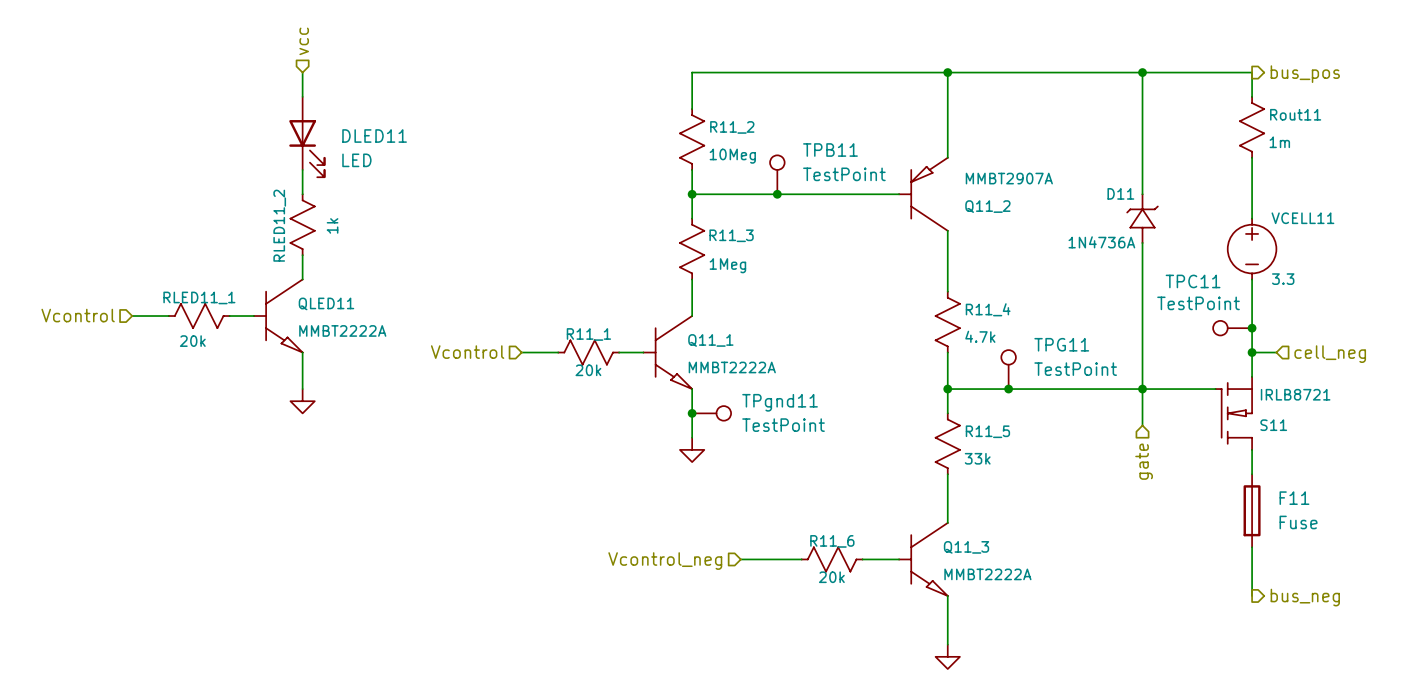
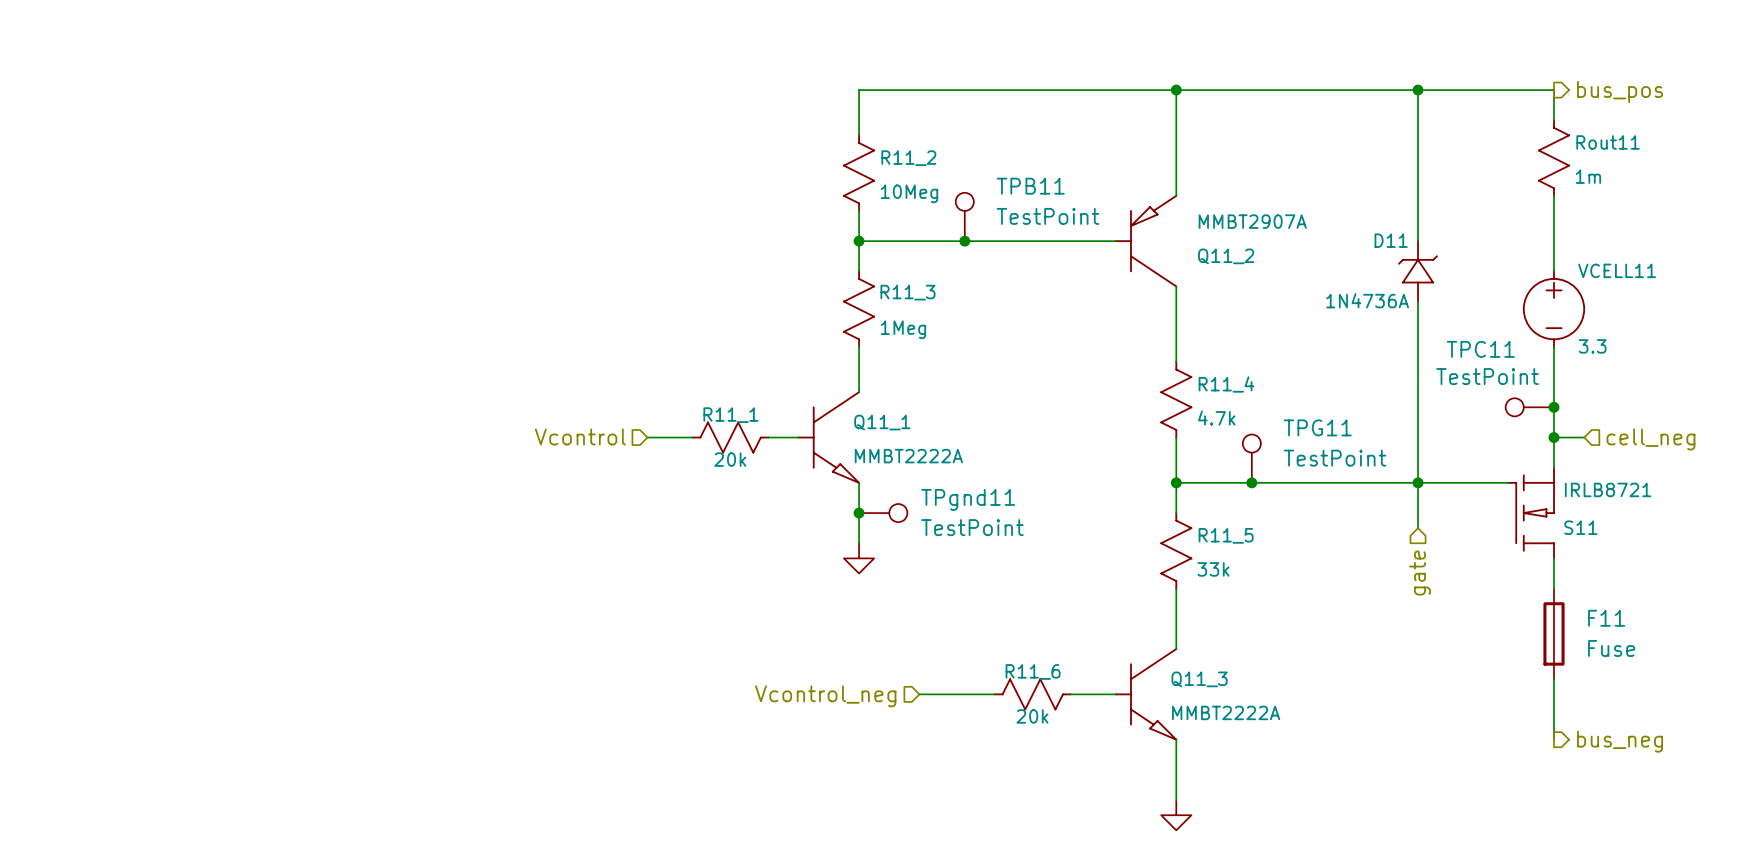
hierarchical label: vcc (304, 41) -> none
wire: (302, 72) (302, 96) -> none
DLED11: LED (306, 137) -> none
wire: (302, 169) (302, 194) -> none
RLED11_2: 1k (302, 224) -> none
wire: (302, 255) (302, 279) -> none
hierarchical label: Vcontrol (78, 315) -> none
wire: (132, 316) (168, 316) -> none
RLED11_1: 20k (199, 316) -> none
wire: (229, 316) (253, 316) -> none
QLED11: MMBT2222A (278, 316) -> none
wire: (302, 352) (302, 389) -> none
power symbol: (302, 401) -> none

